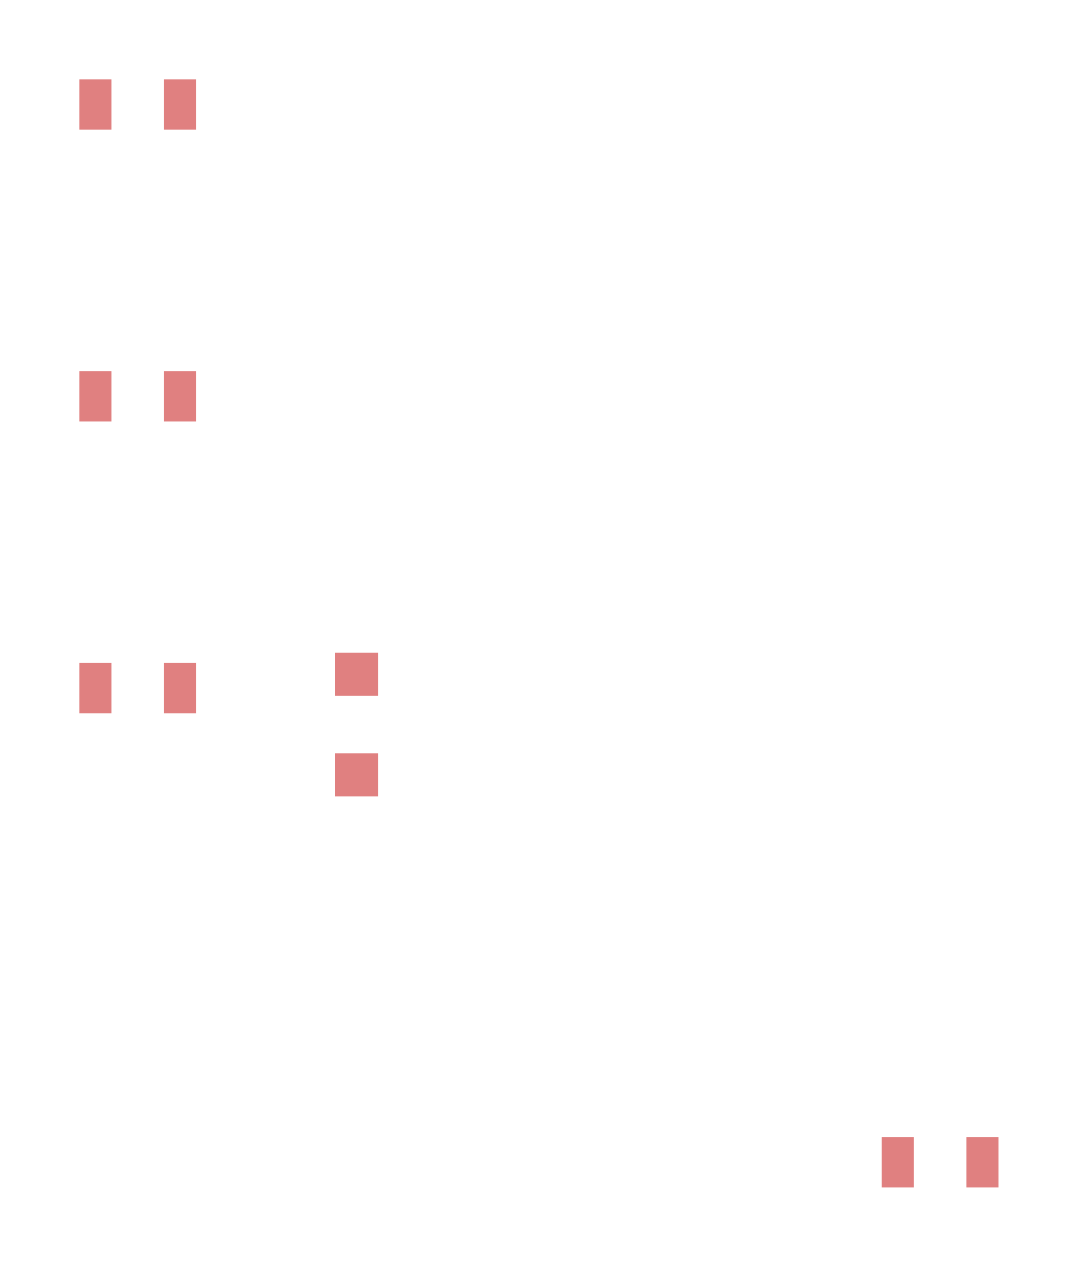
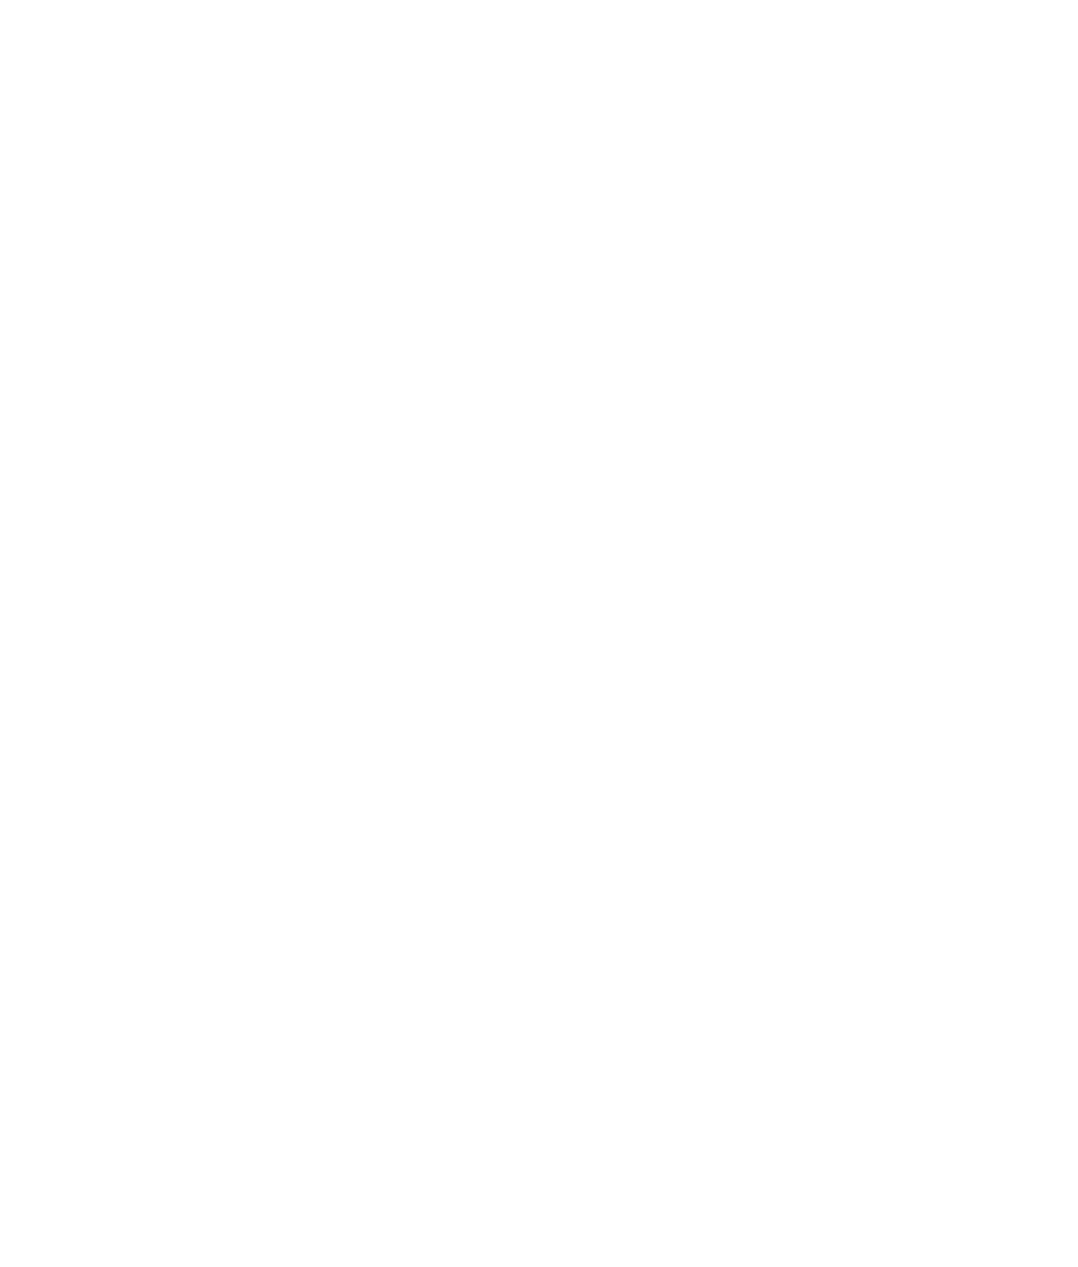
part: (137, 104) -> none
part: (137, 396) -> none
part: (137, 688) -> none
part: (356, 724) -> none
part: (940, 1162) -> none

